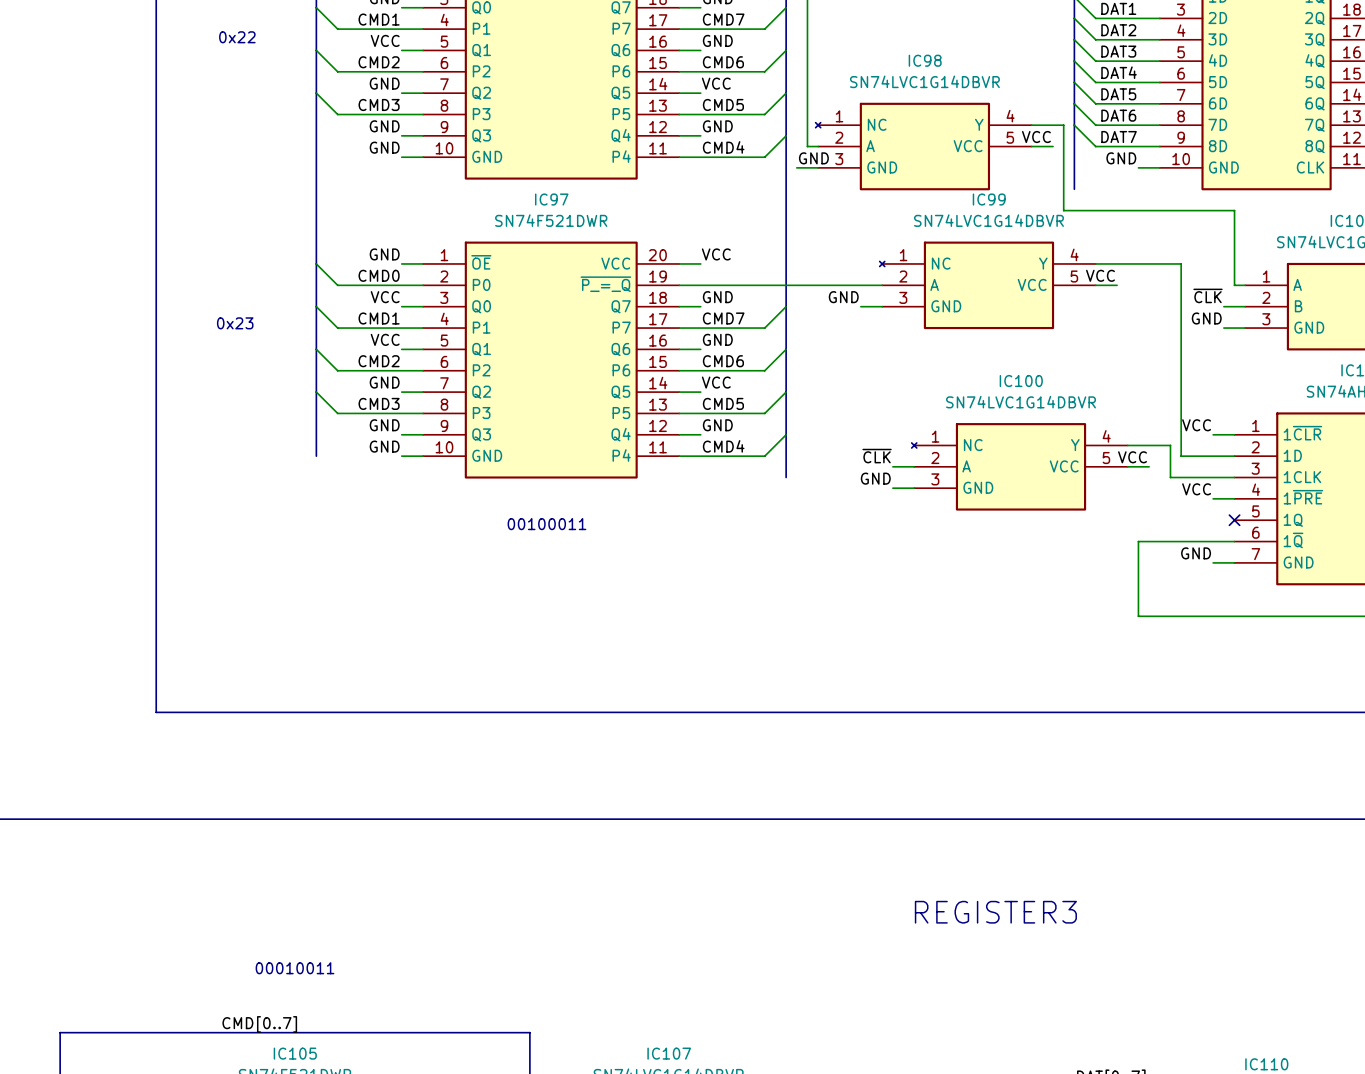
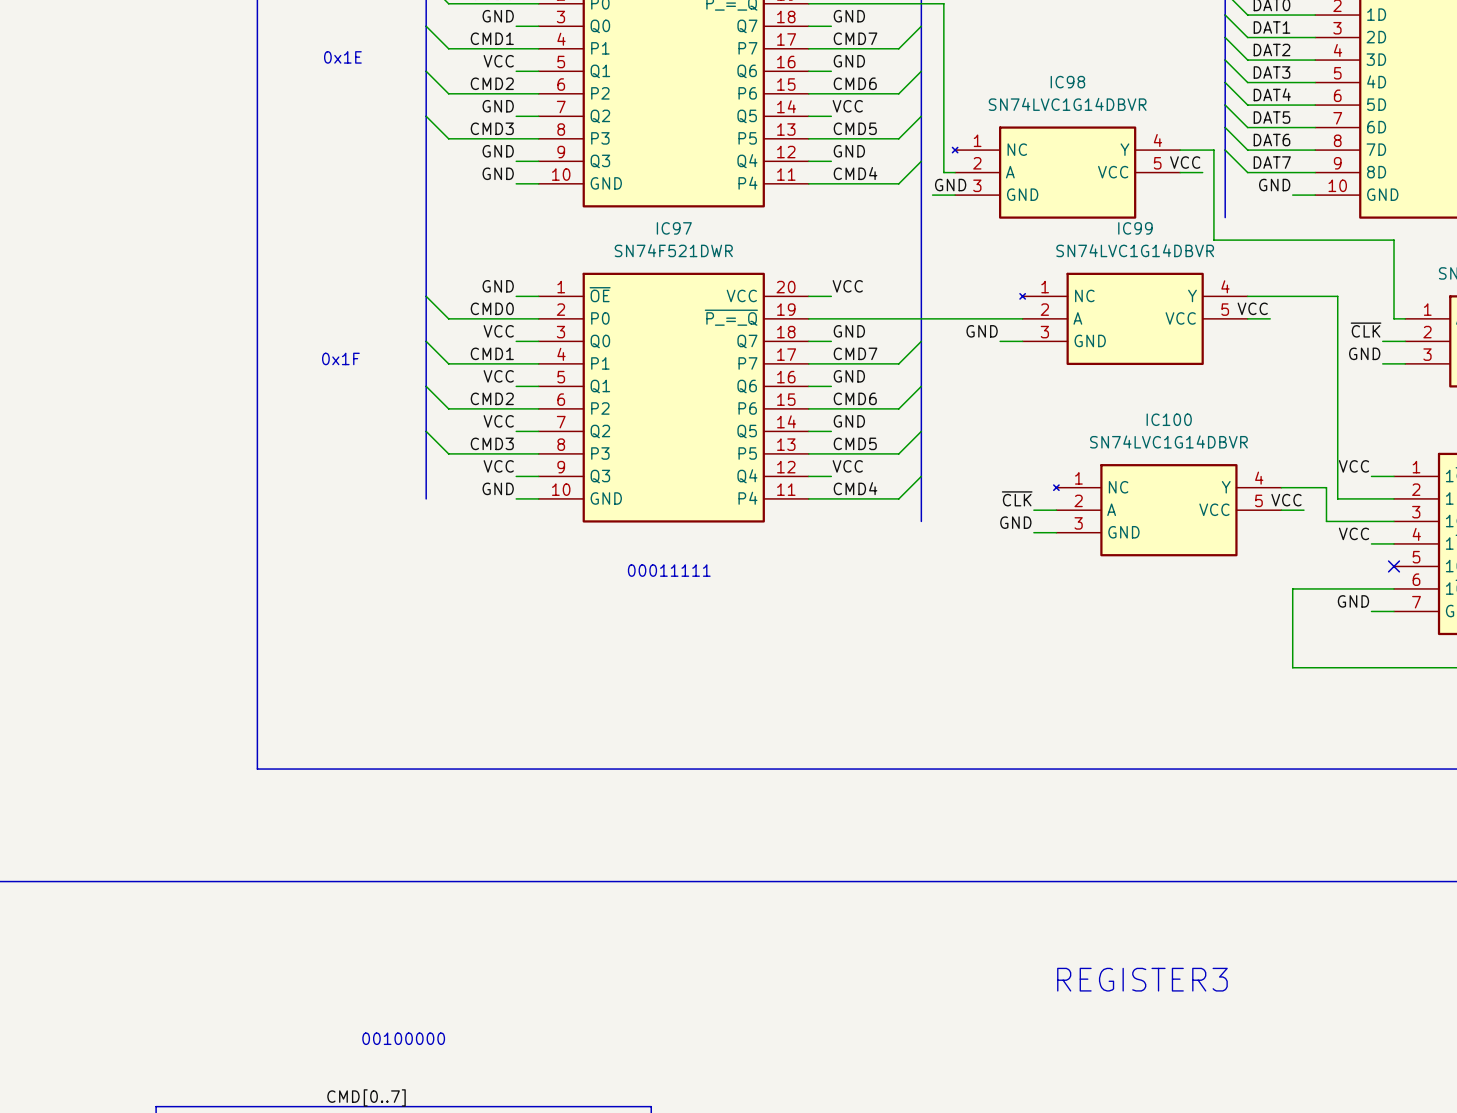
text: 0x22 (237, 37) -> 0x1E (342, 57)
text: 0x23 (235, 323) -> 0x1F (340, 358)
label: GND (384, 382) -> VCC (498, 421)
label: VCC (716, 382) -> GND (849, 421)
label: GND (384, 425) -> VCC (498, 466)
label: GND (717, 425) -> VCC (847, 466)
text: 00100011 (546, 524) -> 00011111 (669, 570)
text: 00010011 (295, 968) -> 00100000 (403, 1038)

